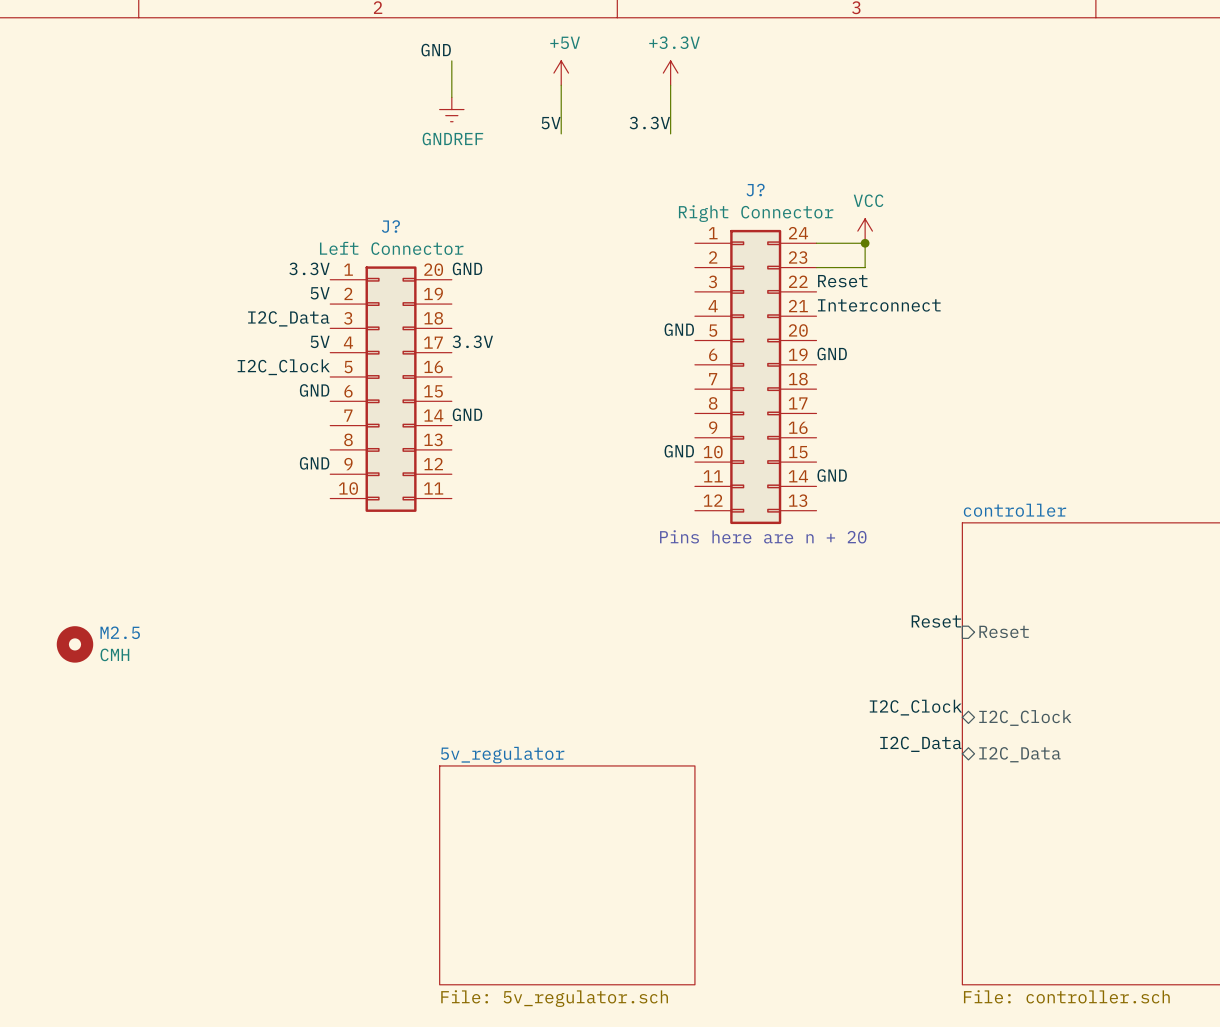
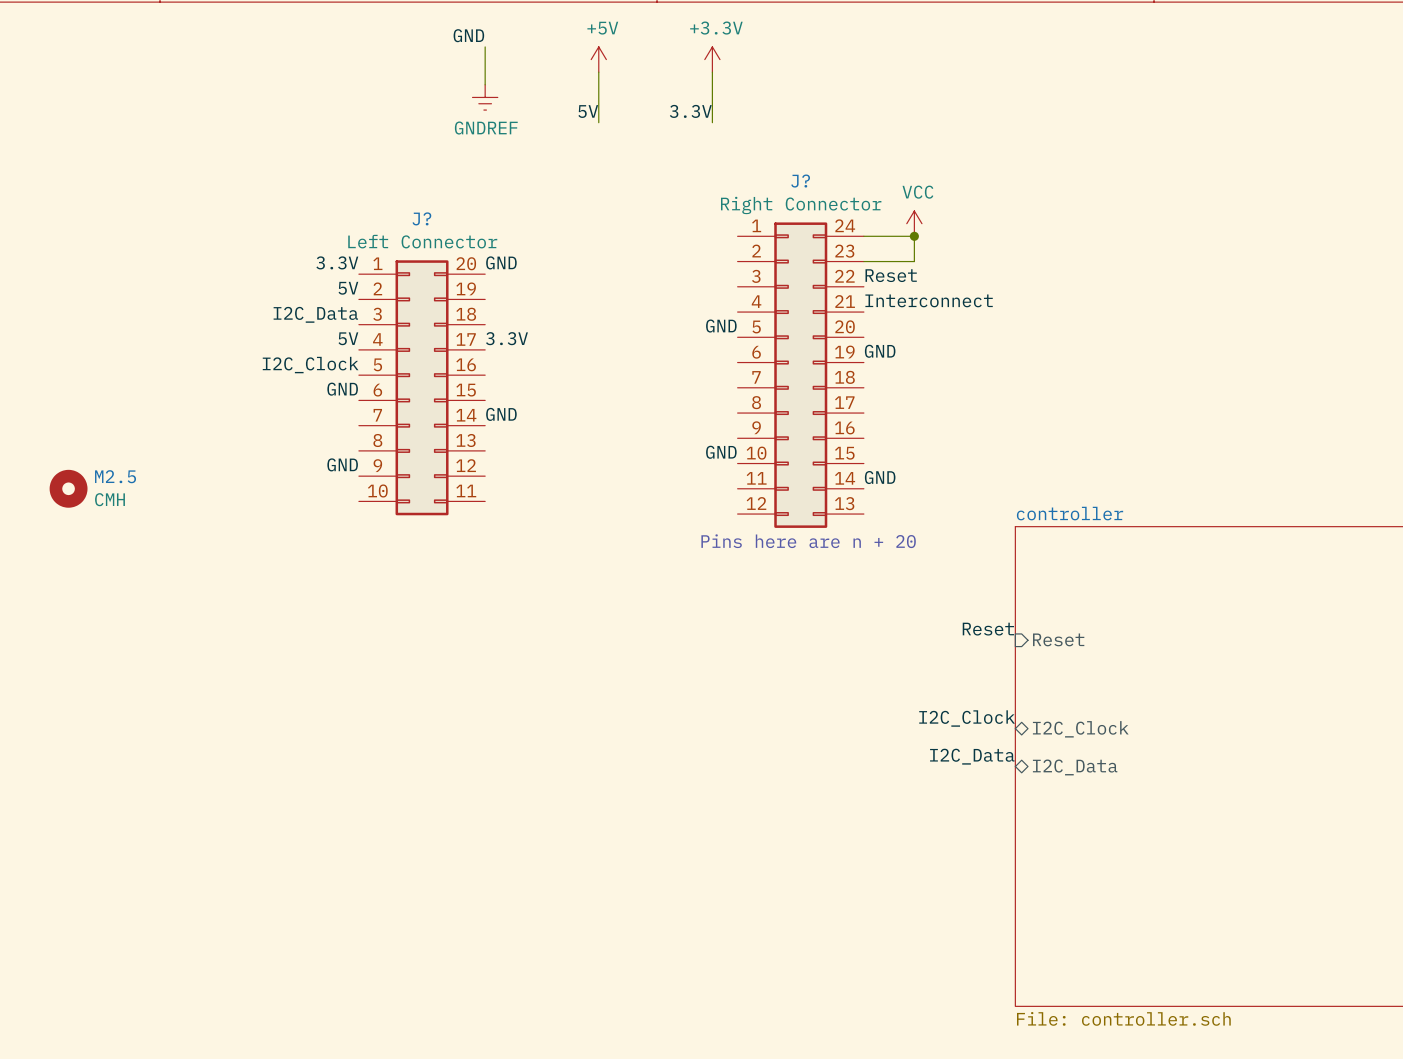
M2.5 position: (74, 644) -> (68, 488)
sheet 5v_regulator: File: 5v_regulator.sch (567, 875) -> none

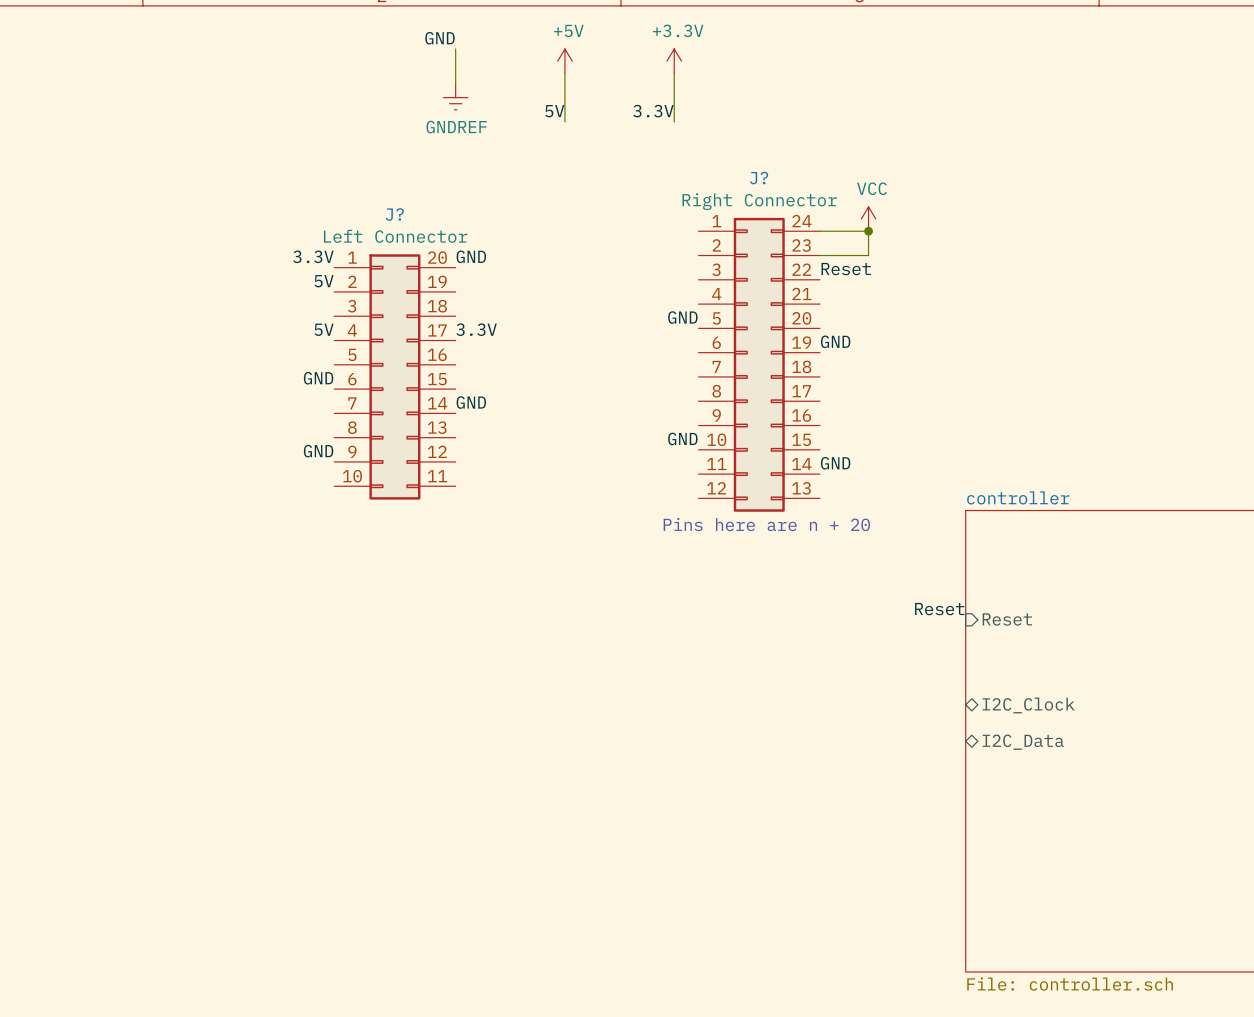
label: Interconnect (929, 300) -> none
label: I2C_Data (315, 314) -> none
label: I2C_Clock (310, 365) -> none
M2.5: CMH (68, 488) -> none
label: I2C_Clock (967, 718) -> none
label: I2C_Data (972, 756) -> none

